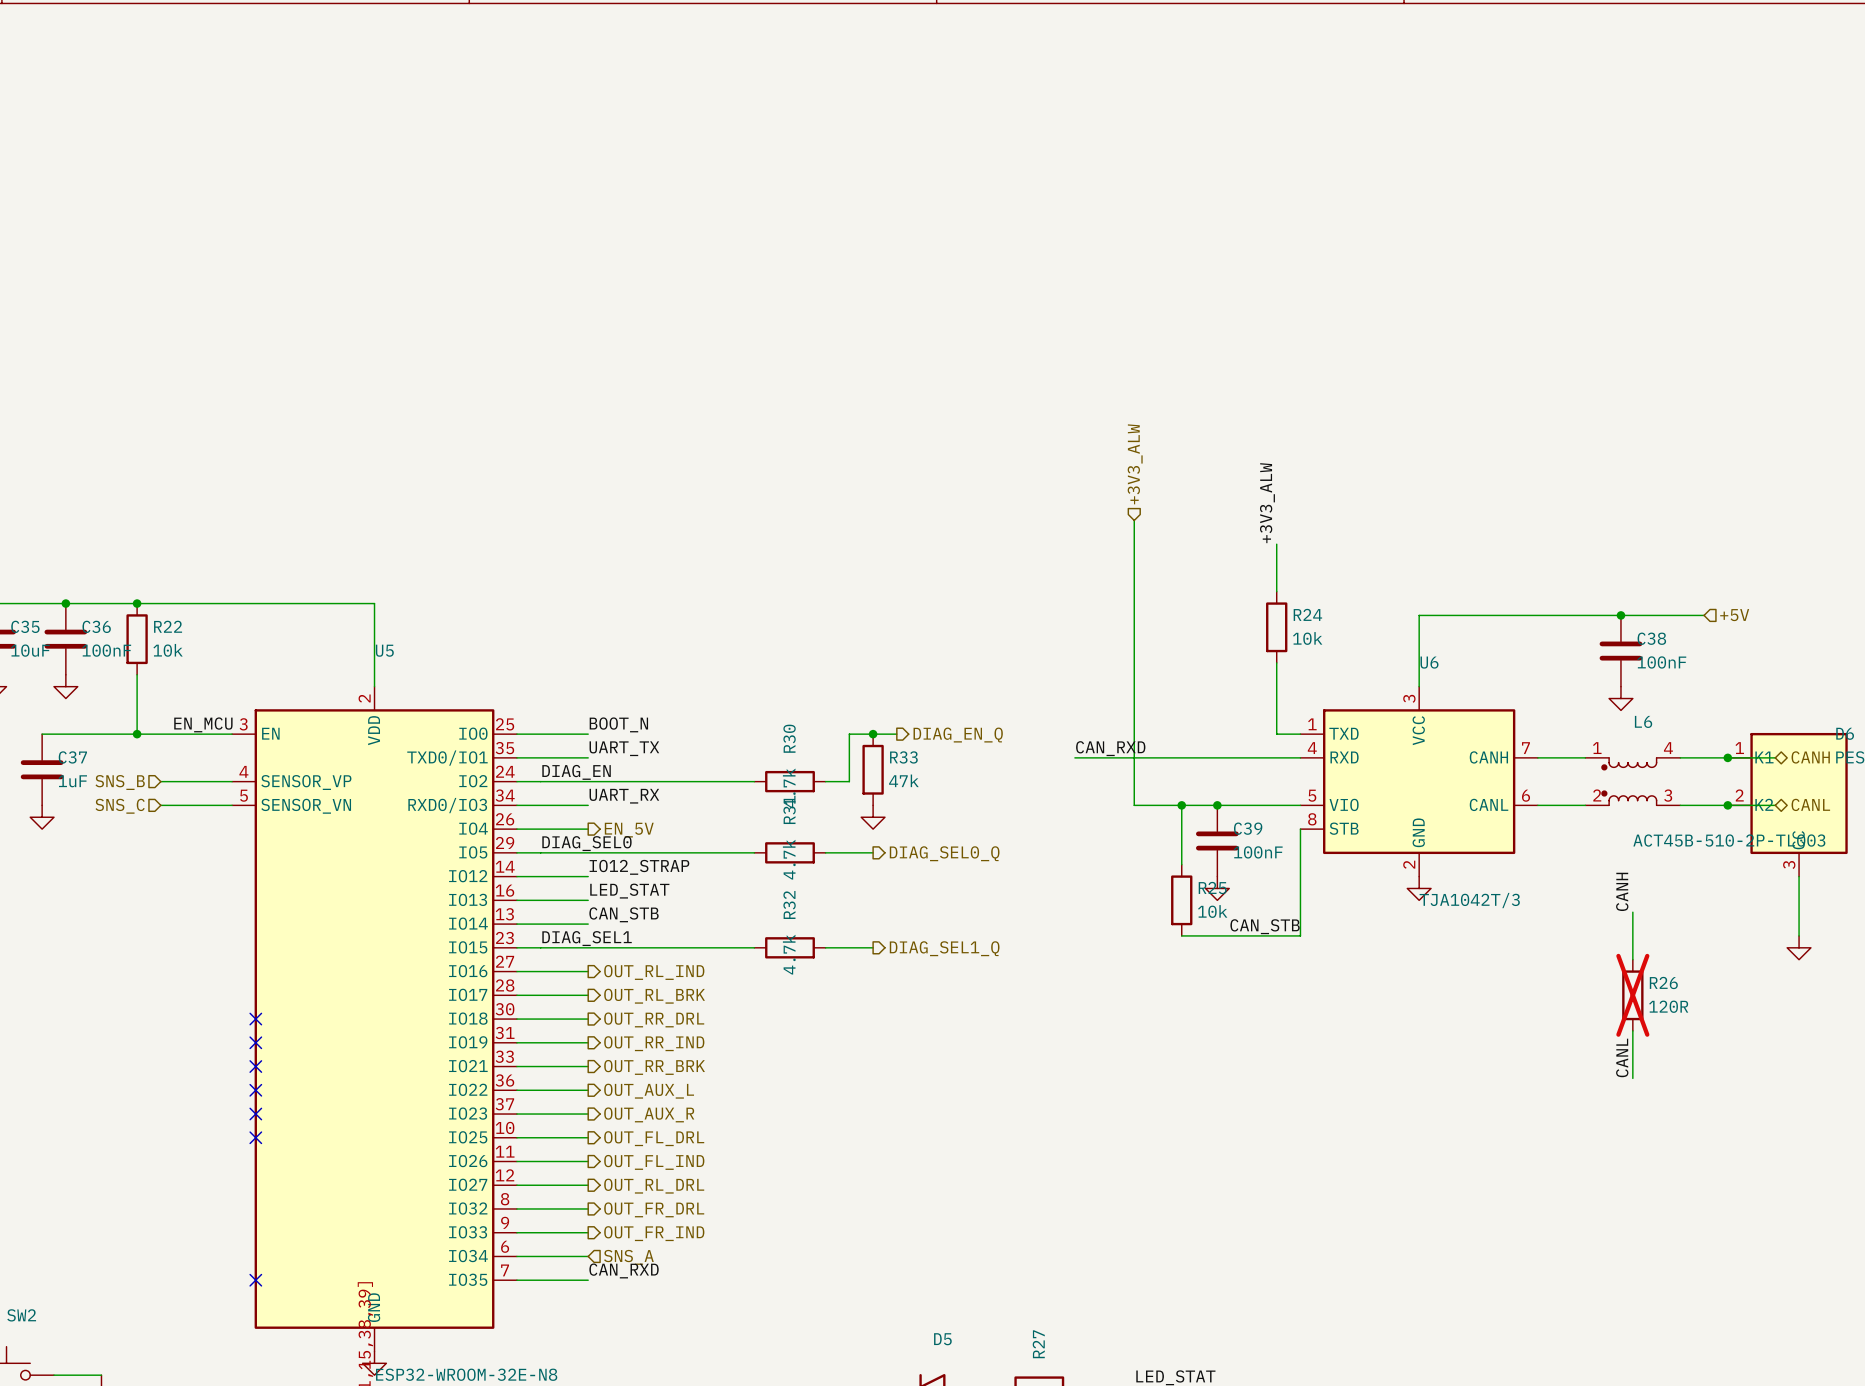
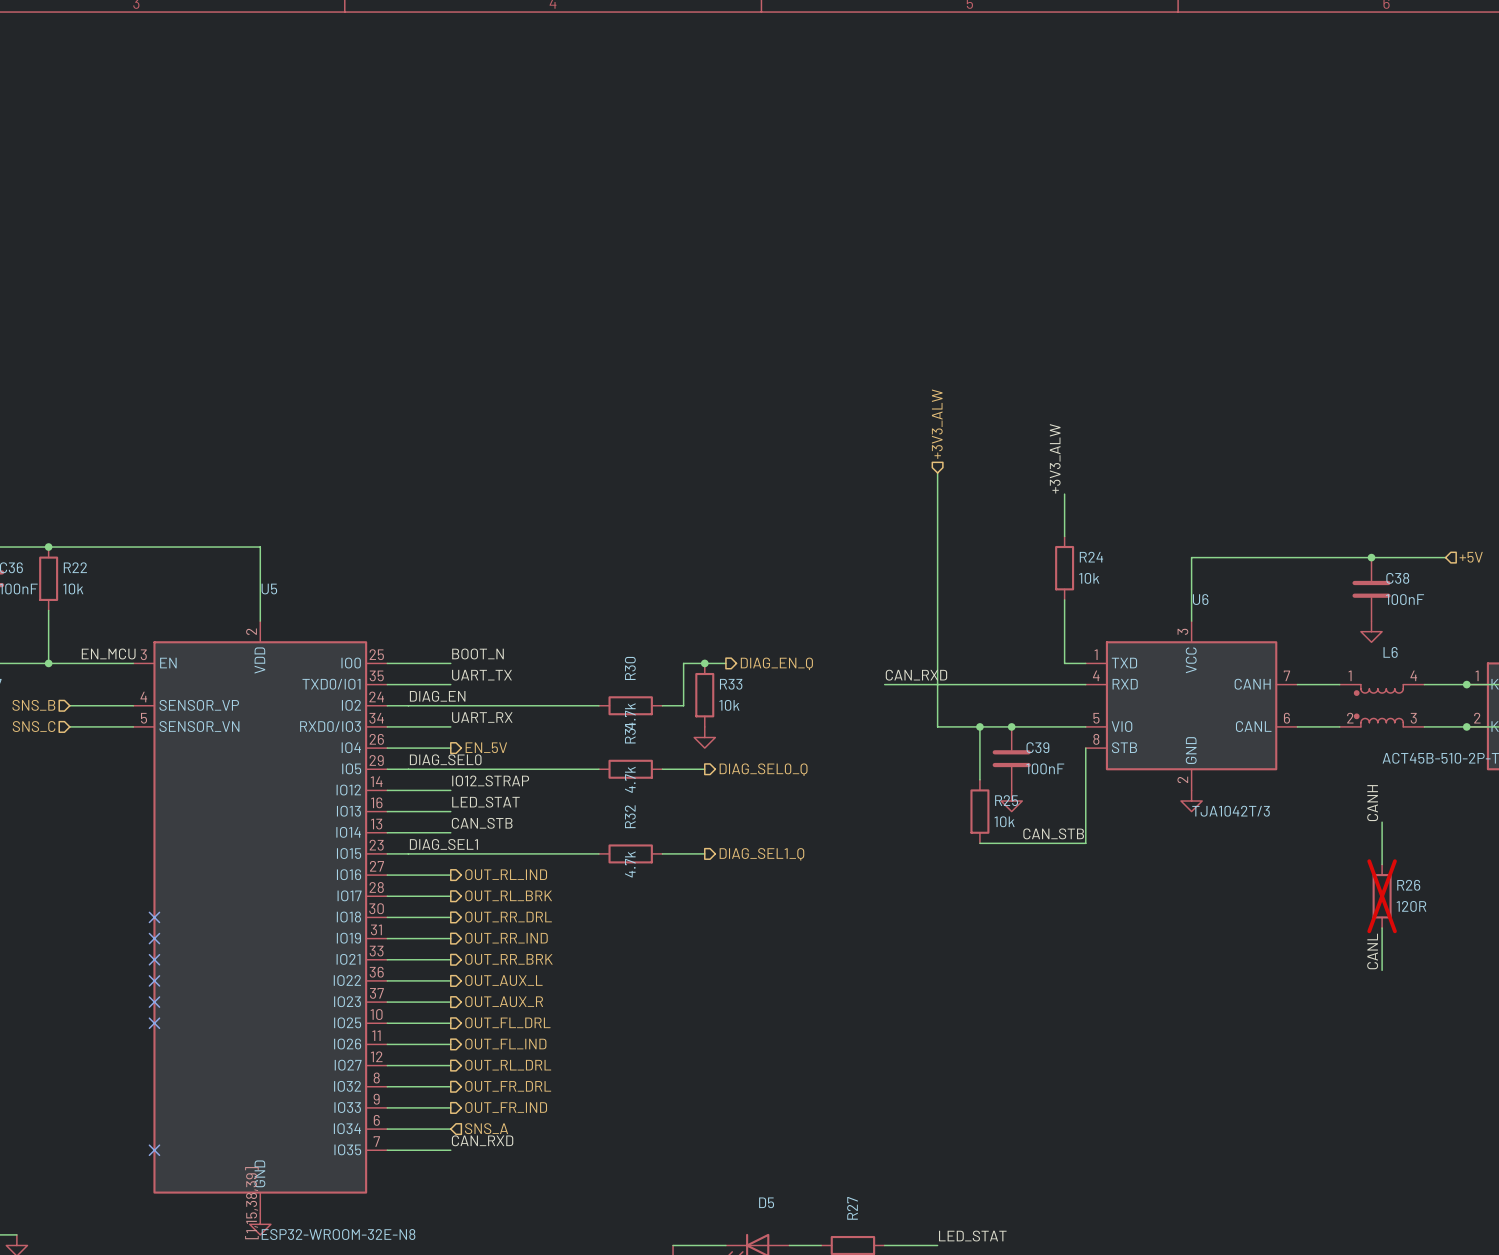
R33 value: 47k (903, 780) -> 10k (729, 705)

